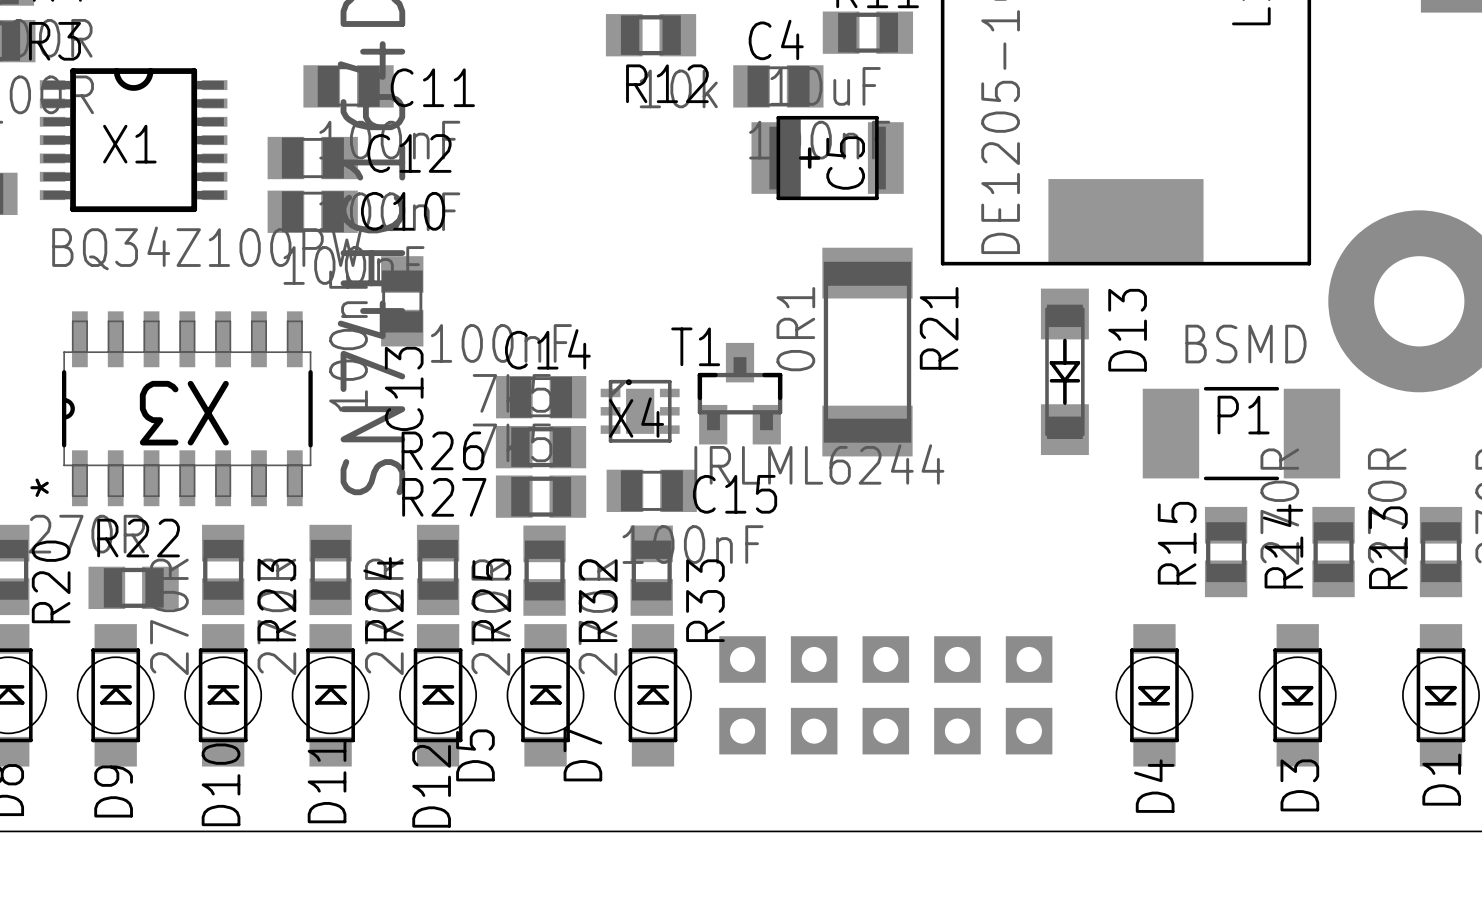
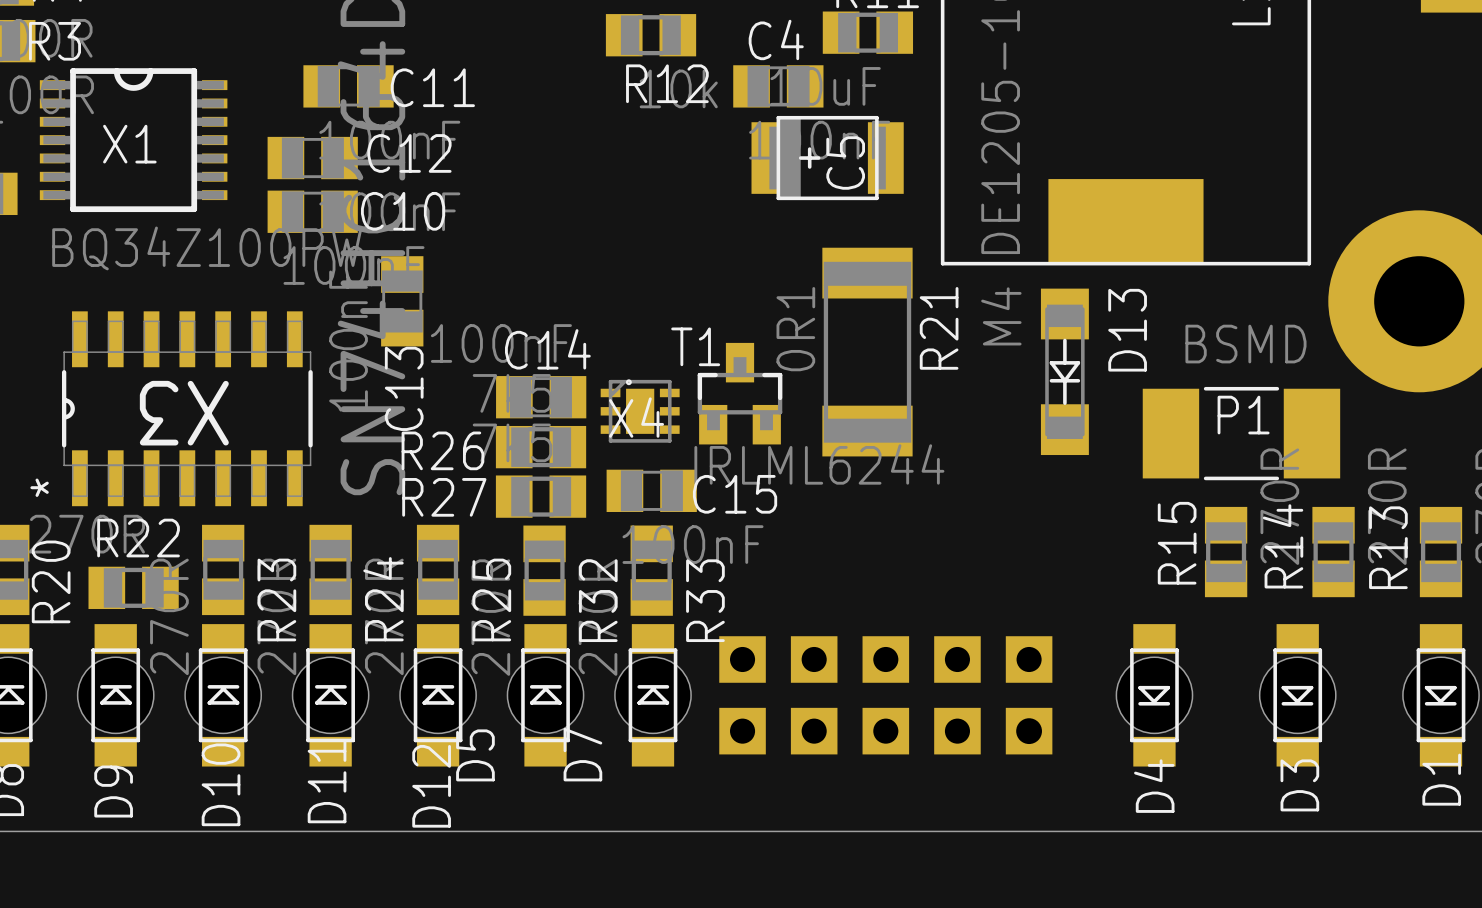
D13 value: none -> M4 (1001, 316)

